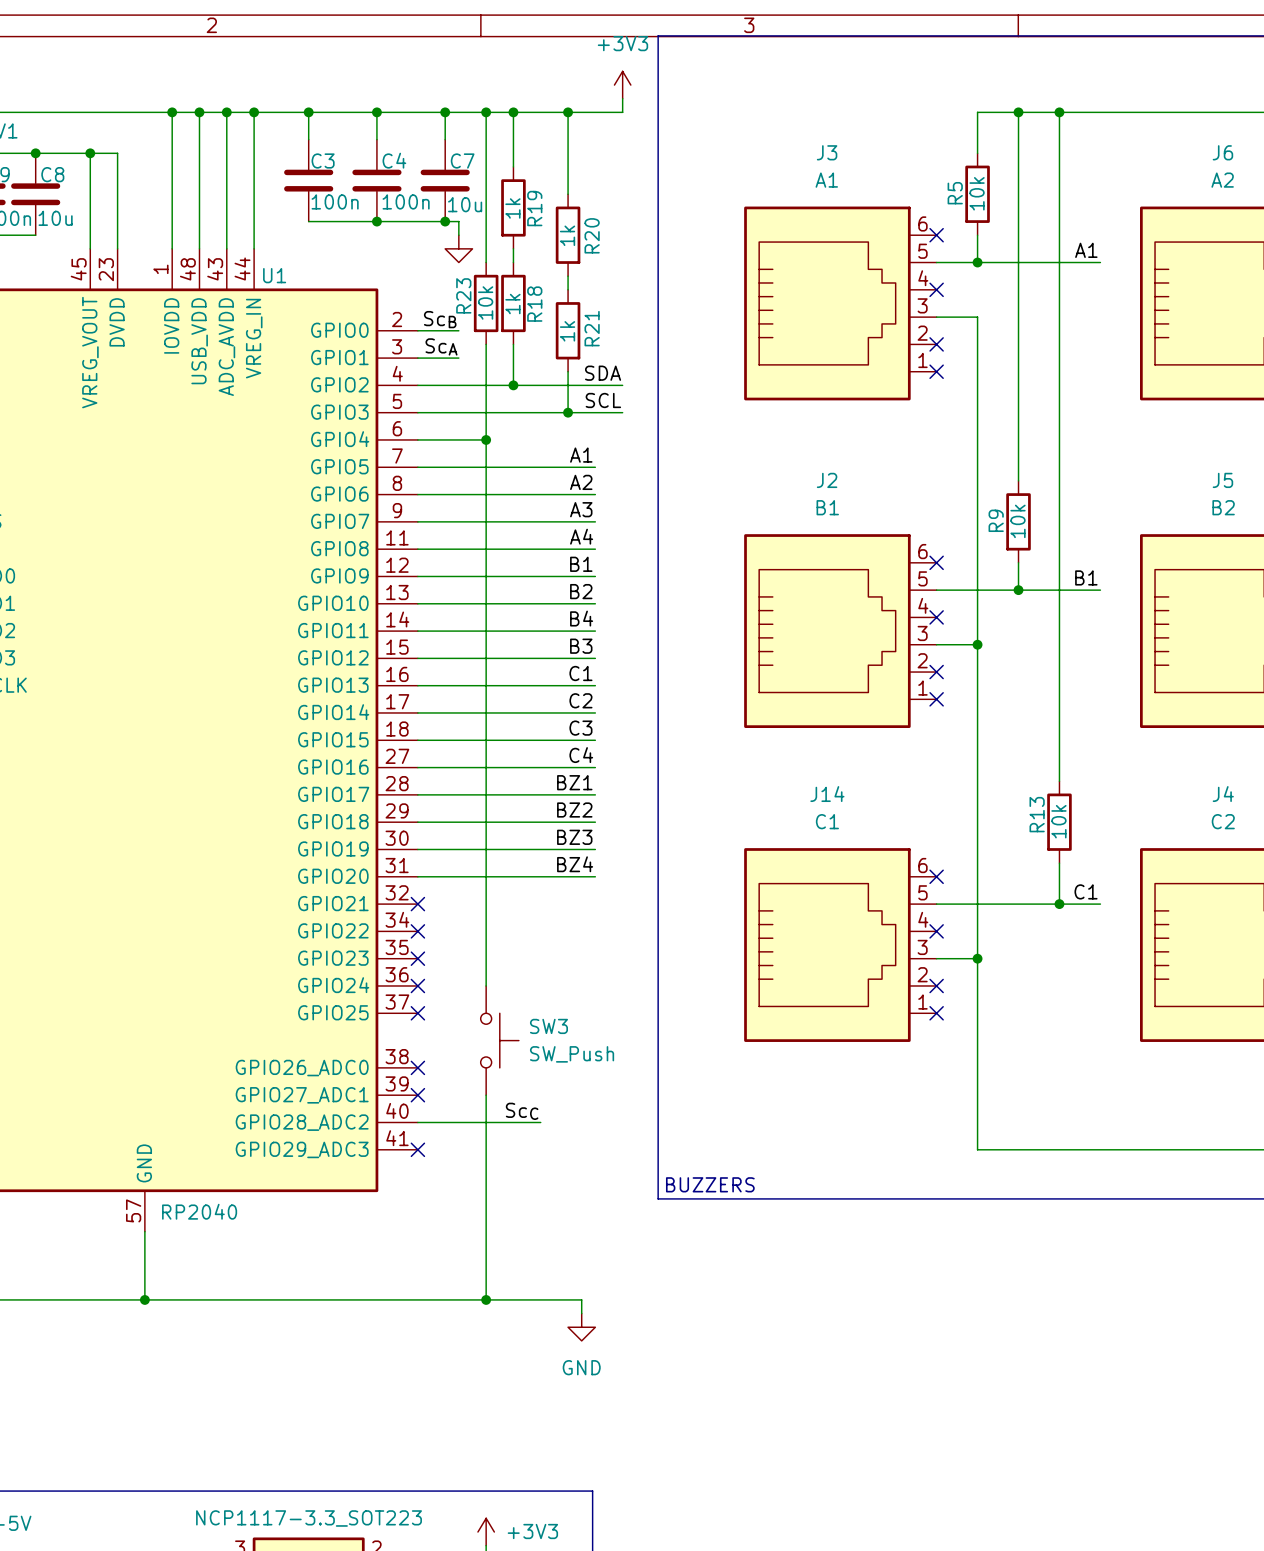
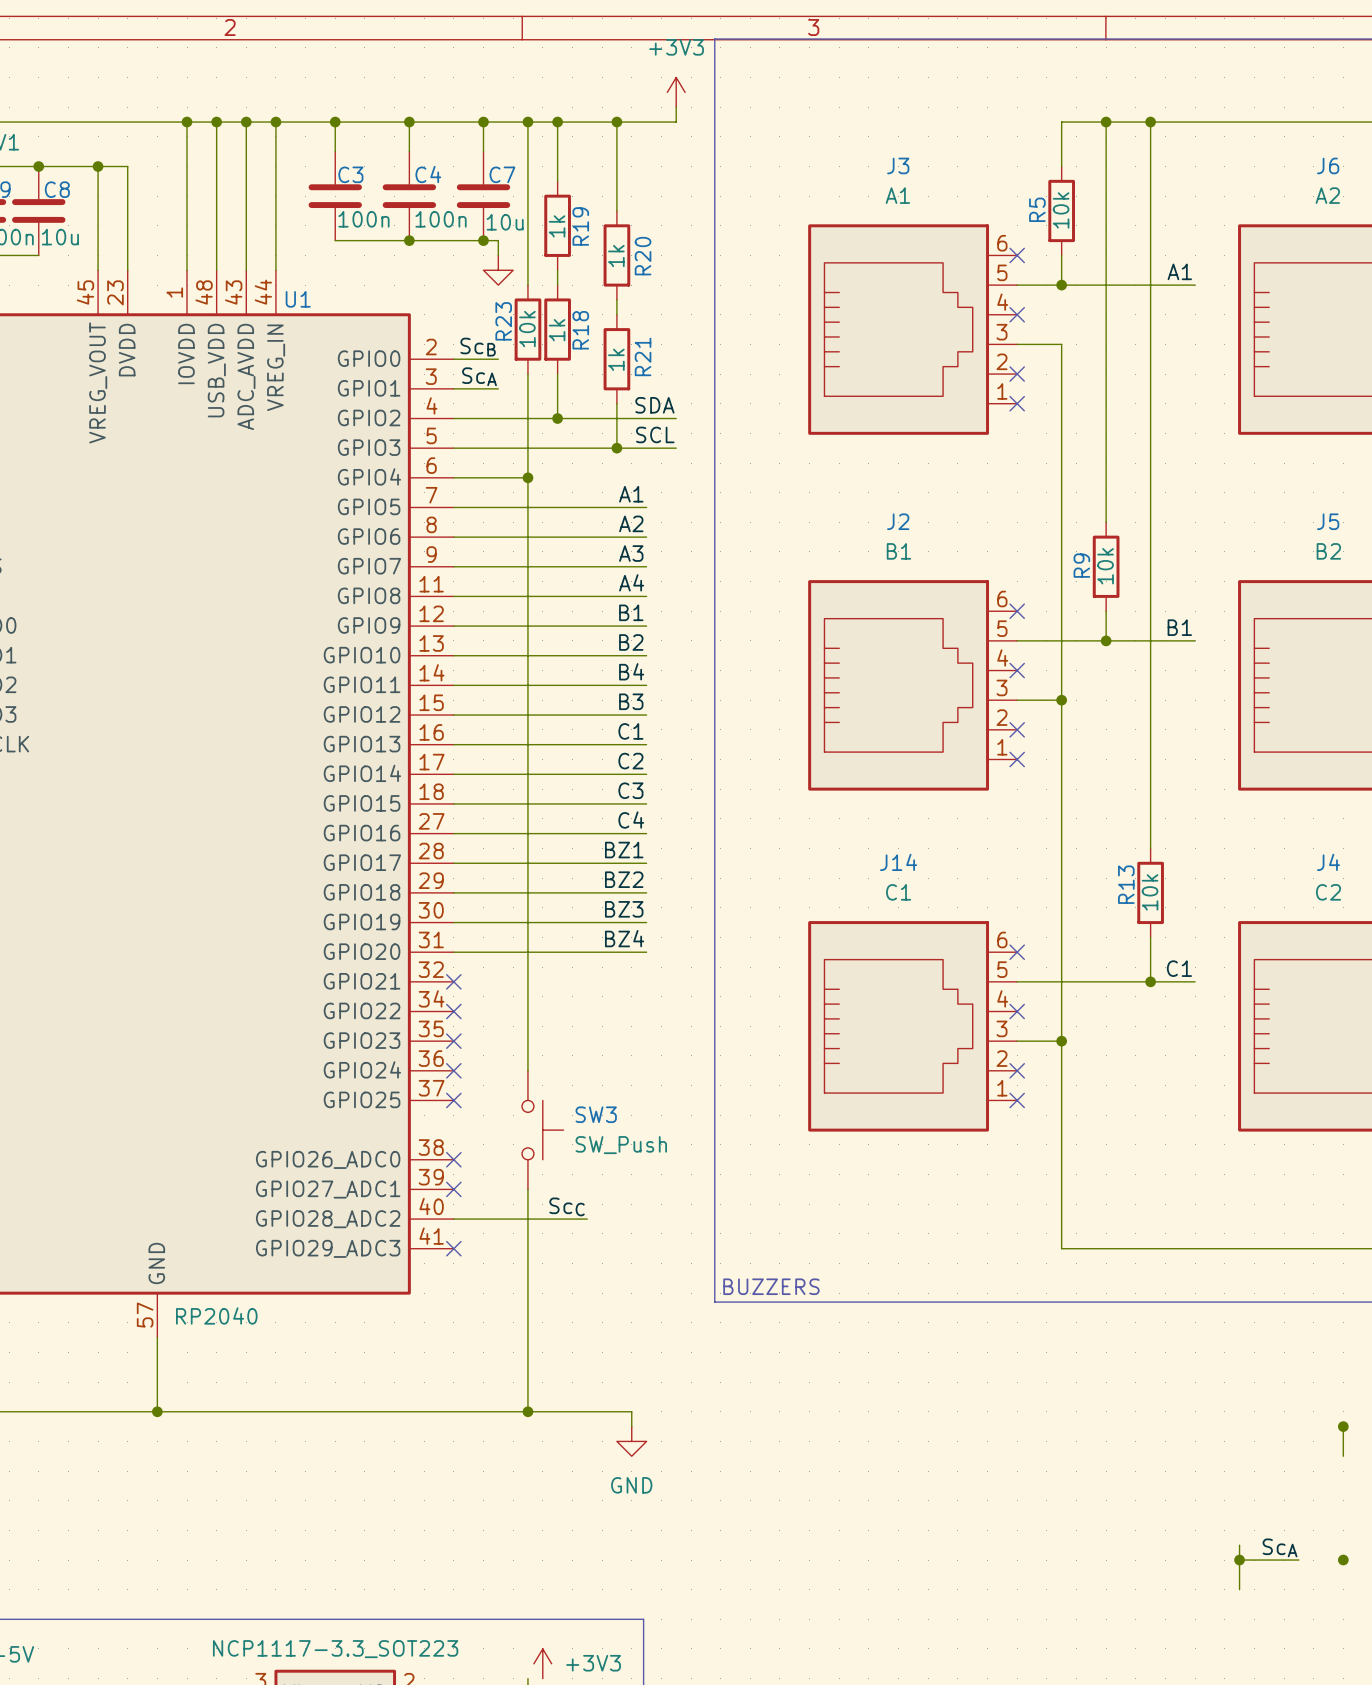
wire: none -> (1343, 1426) (1343, 1456)
junction: none -> (1343, 1426)
wire: none -> (1239, 1545) (1239, 1589)
label: none -> ScA (1280, 1547)
wire: none -> (1239, 1560) (1298, 1560)
junction: none -> (1239, 1560)
junction: none -> (1343, 1560)
power symbol position: +3V3 (486, 1532) -> +3V3 (542, 1663)

